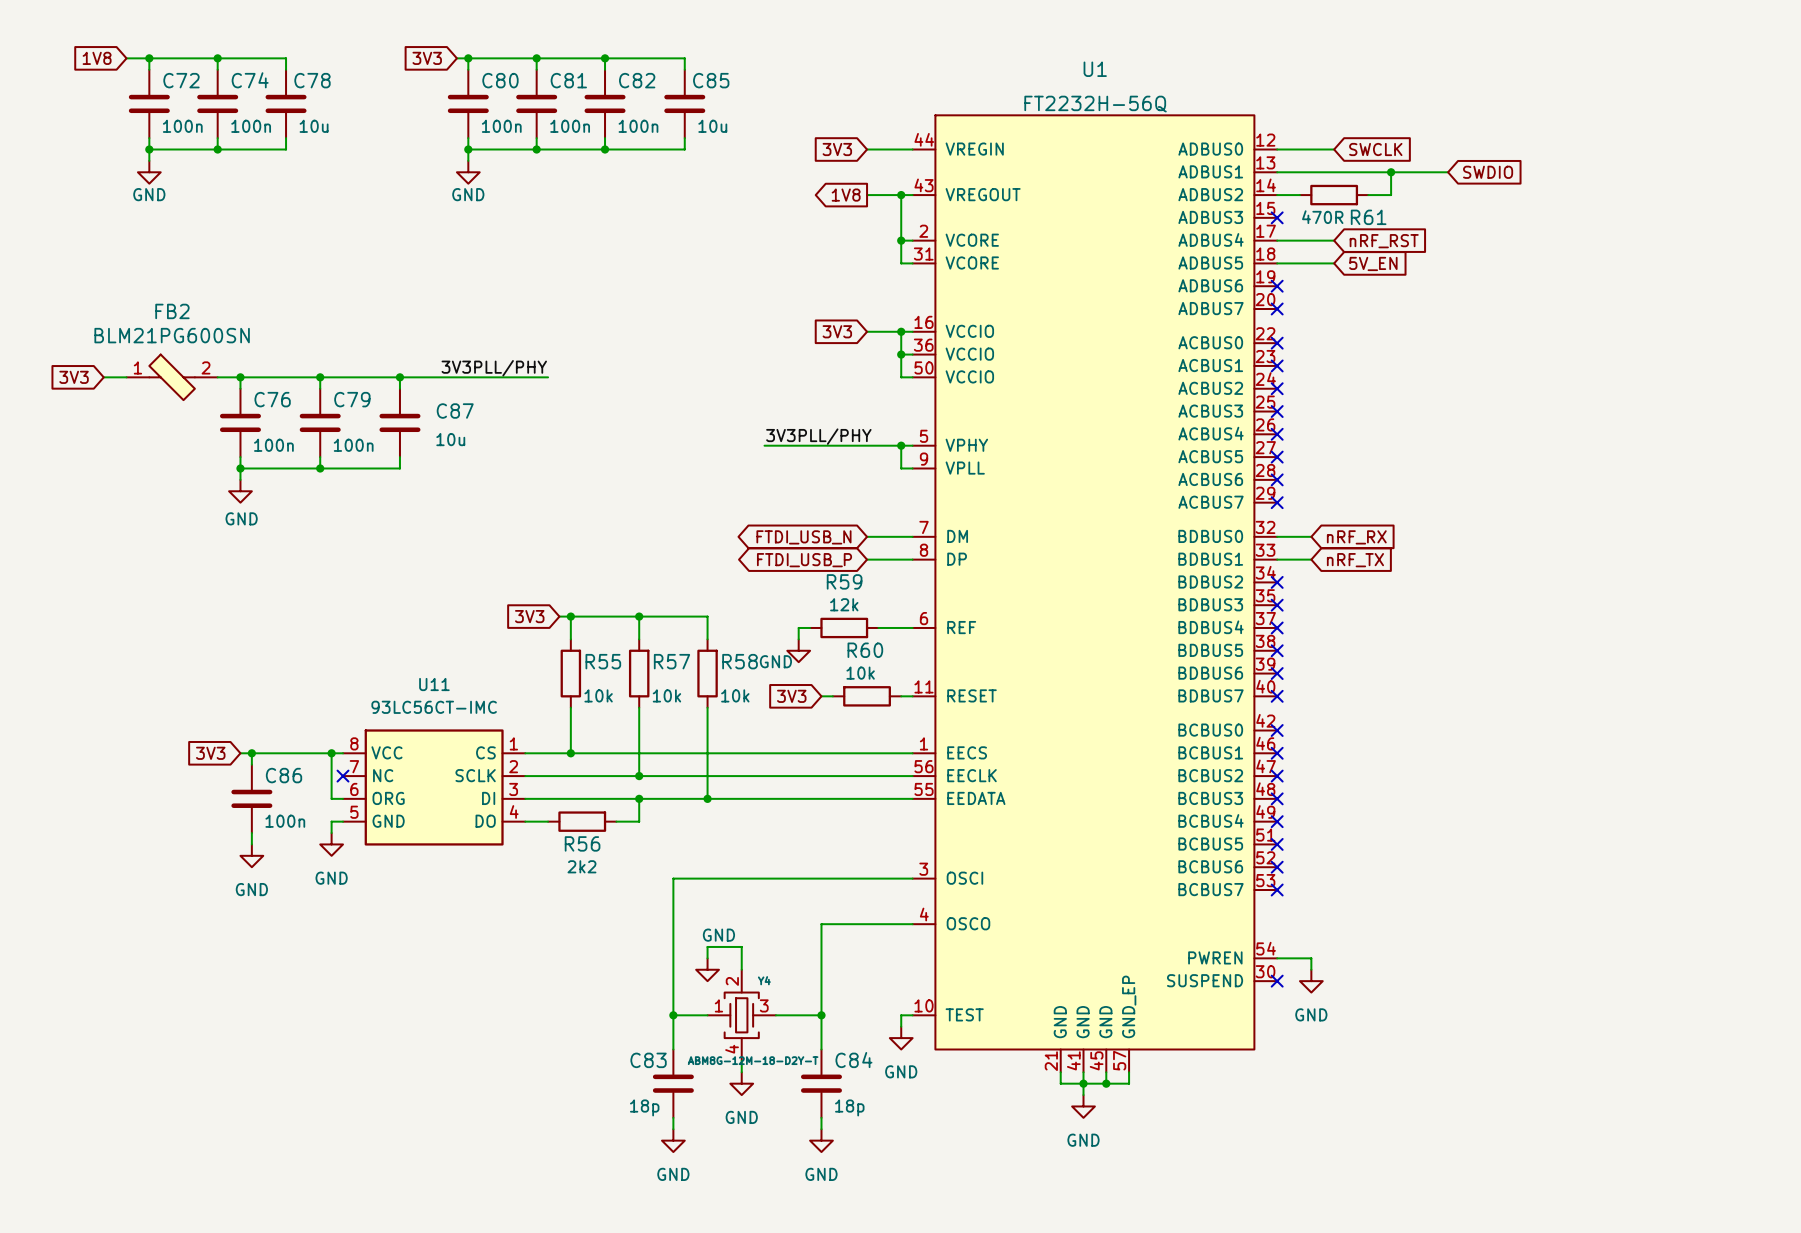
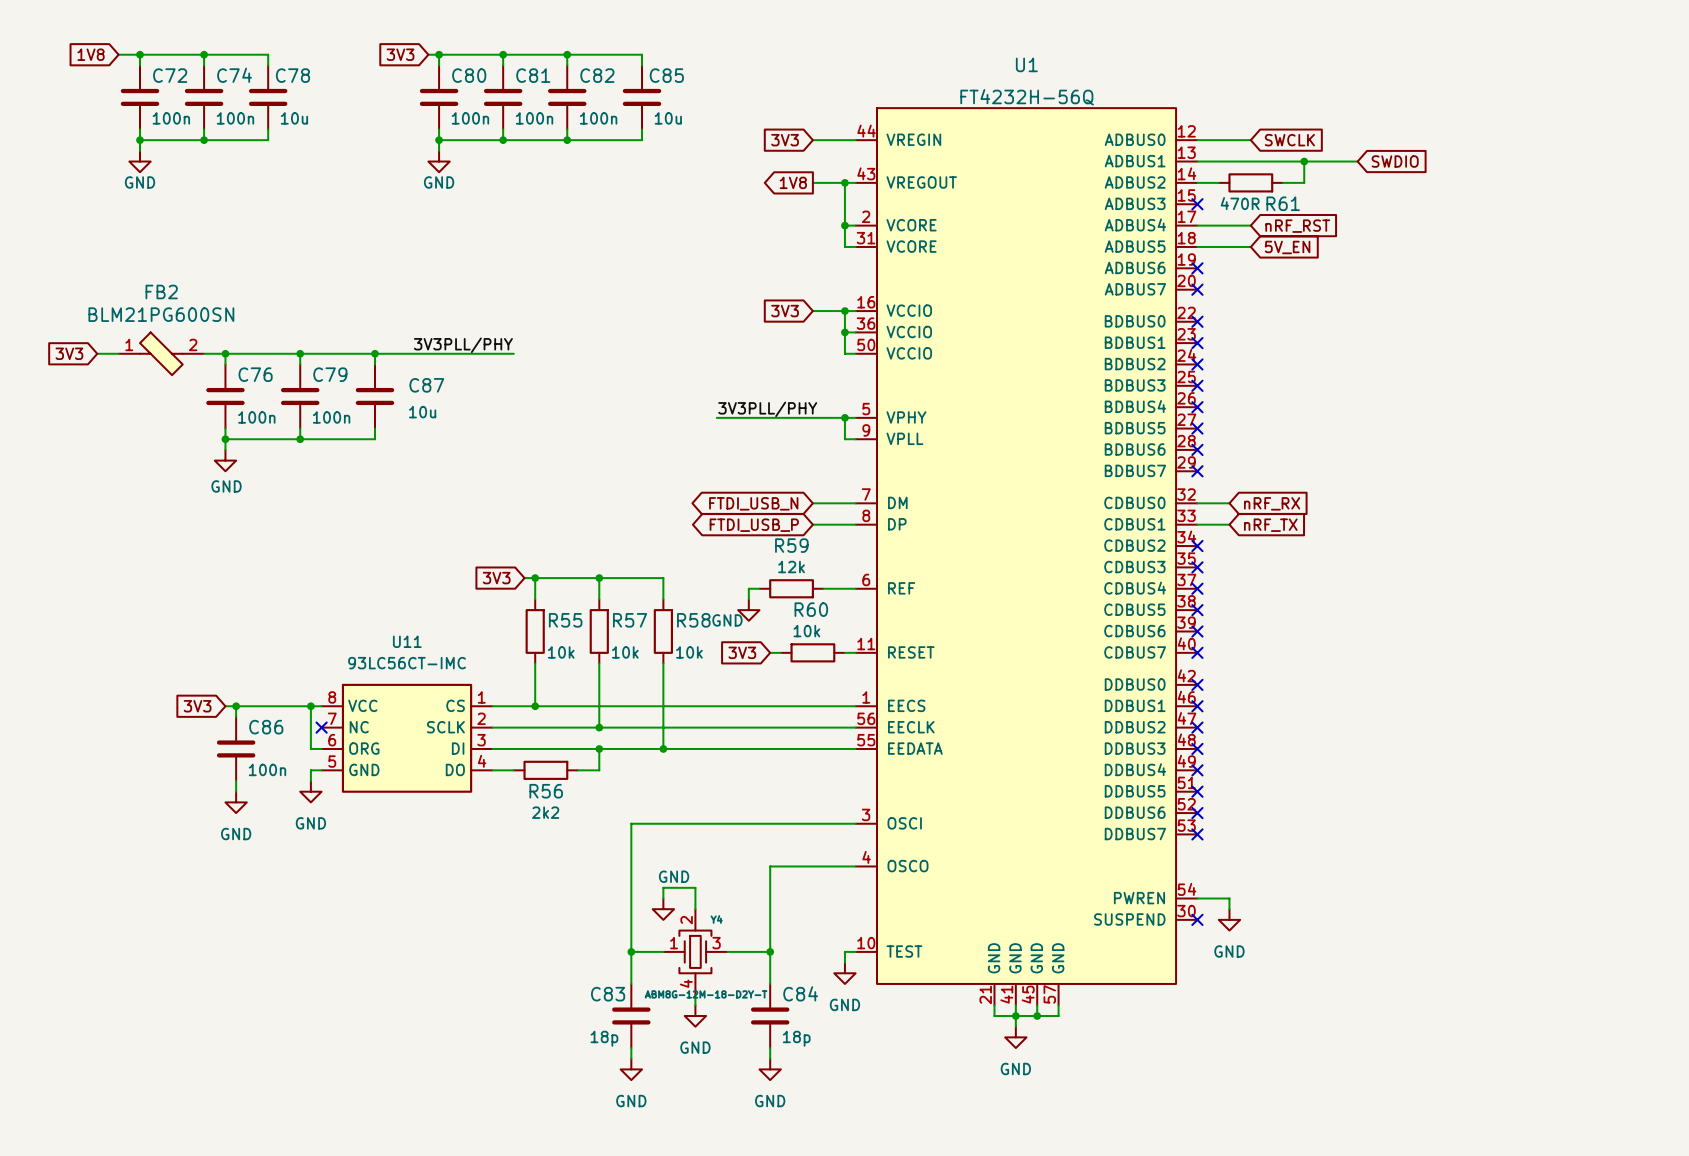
U1 value: FT2232H-56Q (1095, 104) -> FT4232H-56Q (1027, 97)
U1 symbol: [912, 115, 1278, 1073] -> [855, 108, 1198, 1006]

